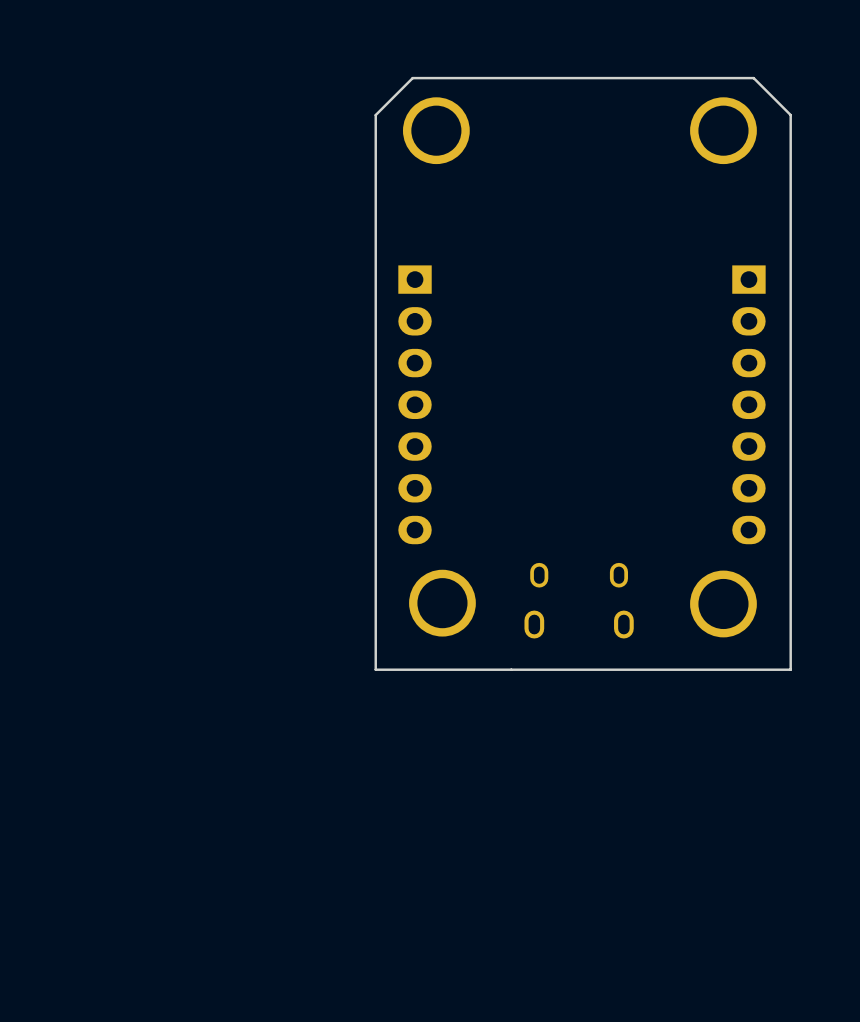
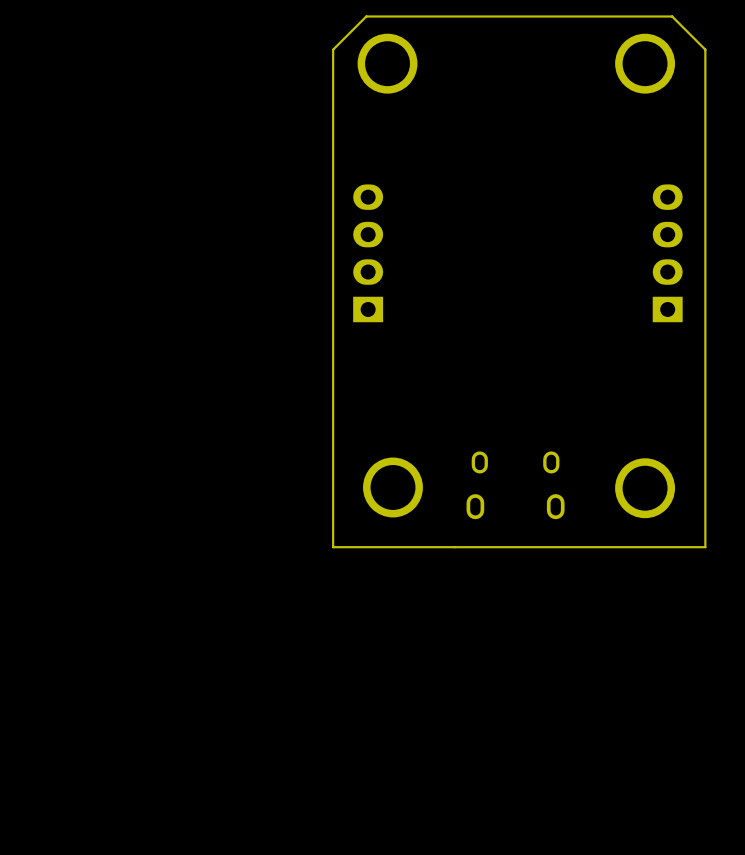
part: none -> (368, 253)
part: none -> (667, 253)
part: (415, 404) -> none
part: (748, 404) -> none

